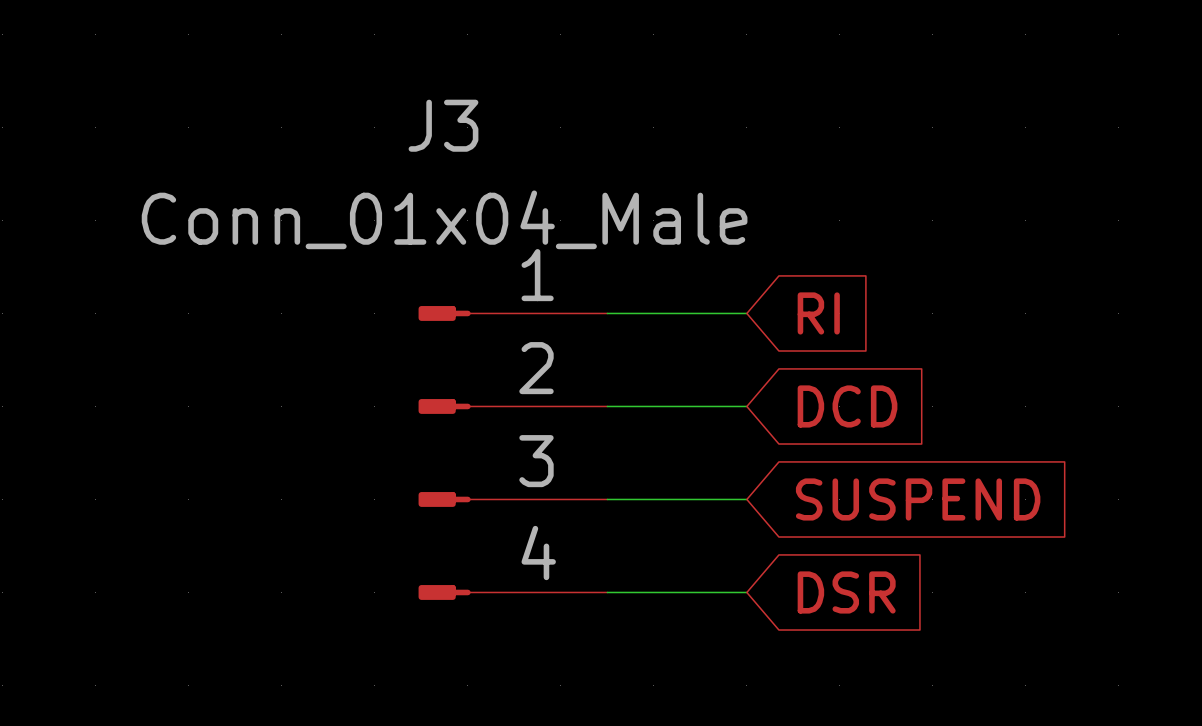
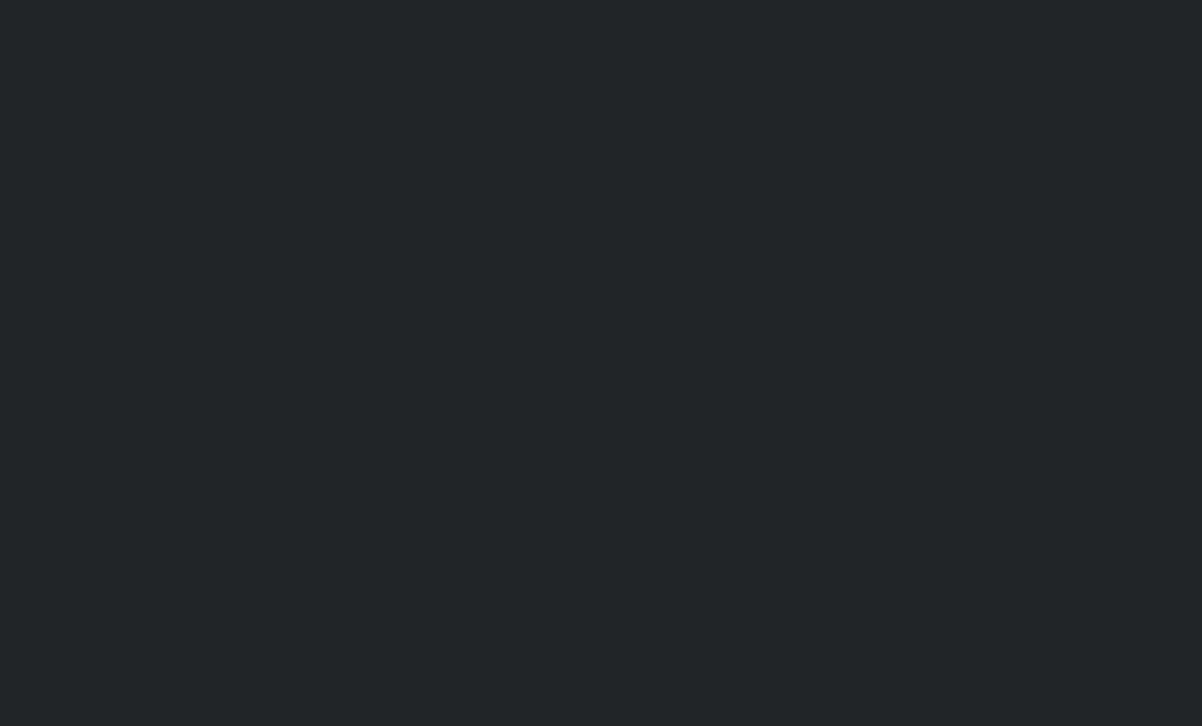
wire: (607, 313) (746, 313) -> none
global label: RI (818, 313) -> none
wire: (607, 406) (746, 406) -> none
global label: DCD (847, 406) -> none
J3: Conn_01x04_Male (512, 452) -> none
wire: (607, 499) (746, 499) -> none
global label: SUSPEND (918, 499) -> none
wire: (607, 592) (746, 592) -> none
global label: DSR (846, 592) -> none

